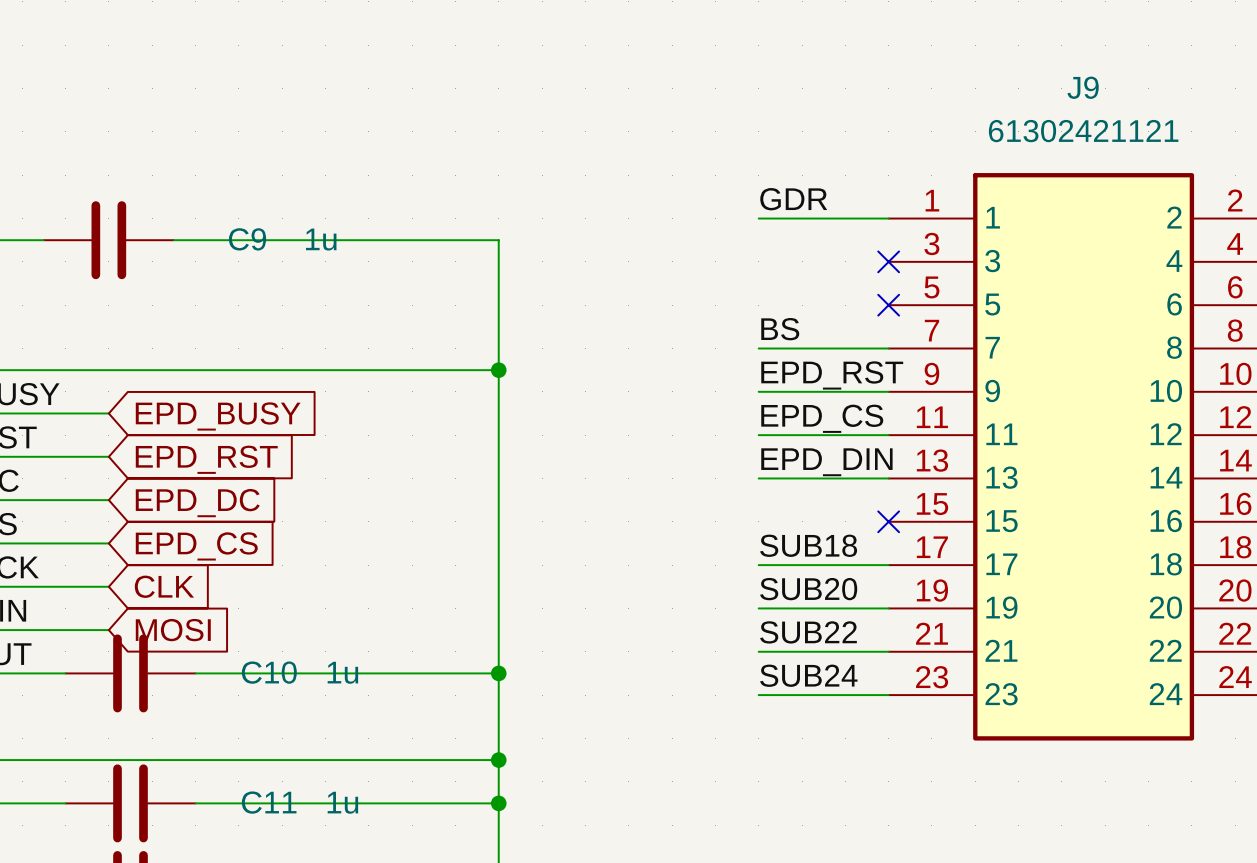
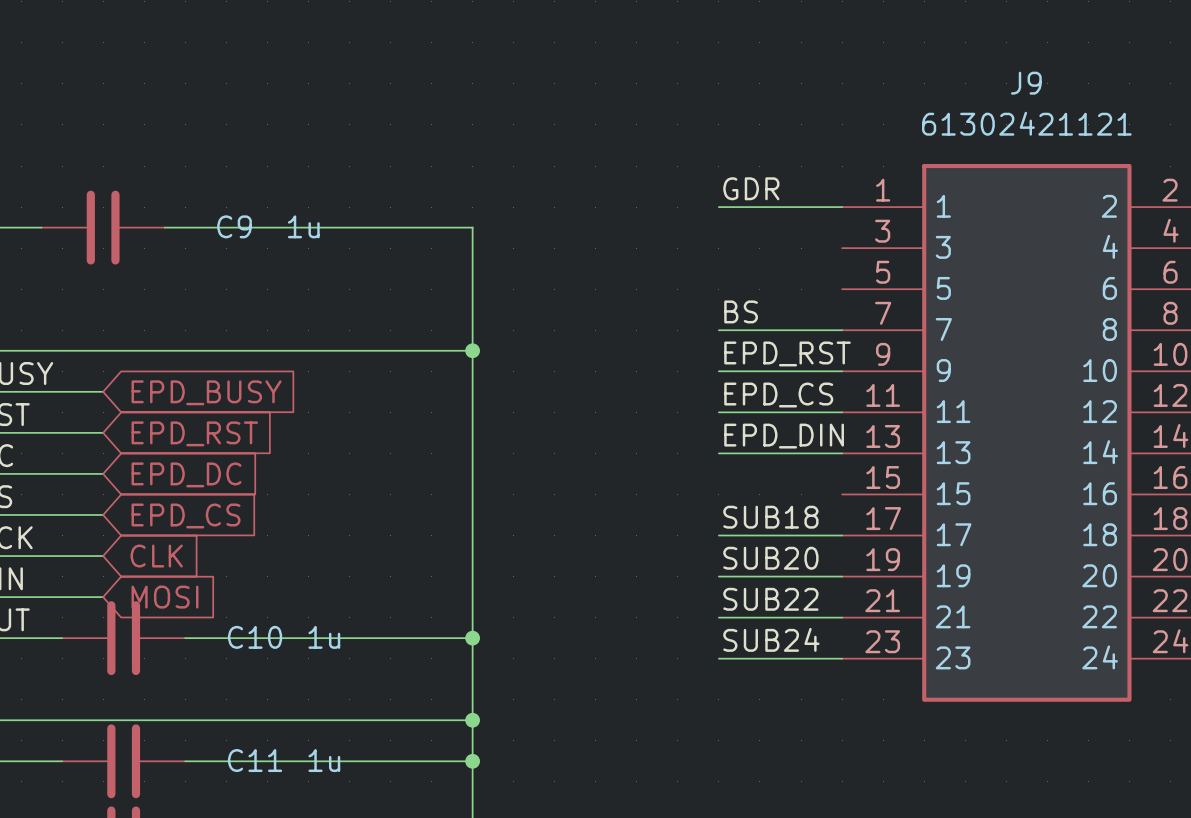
no-connect mark: (888, 261) -> none
no-connect mark: (888, 305) -> none
no-connect mark: (888, 521) -> none

